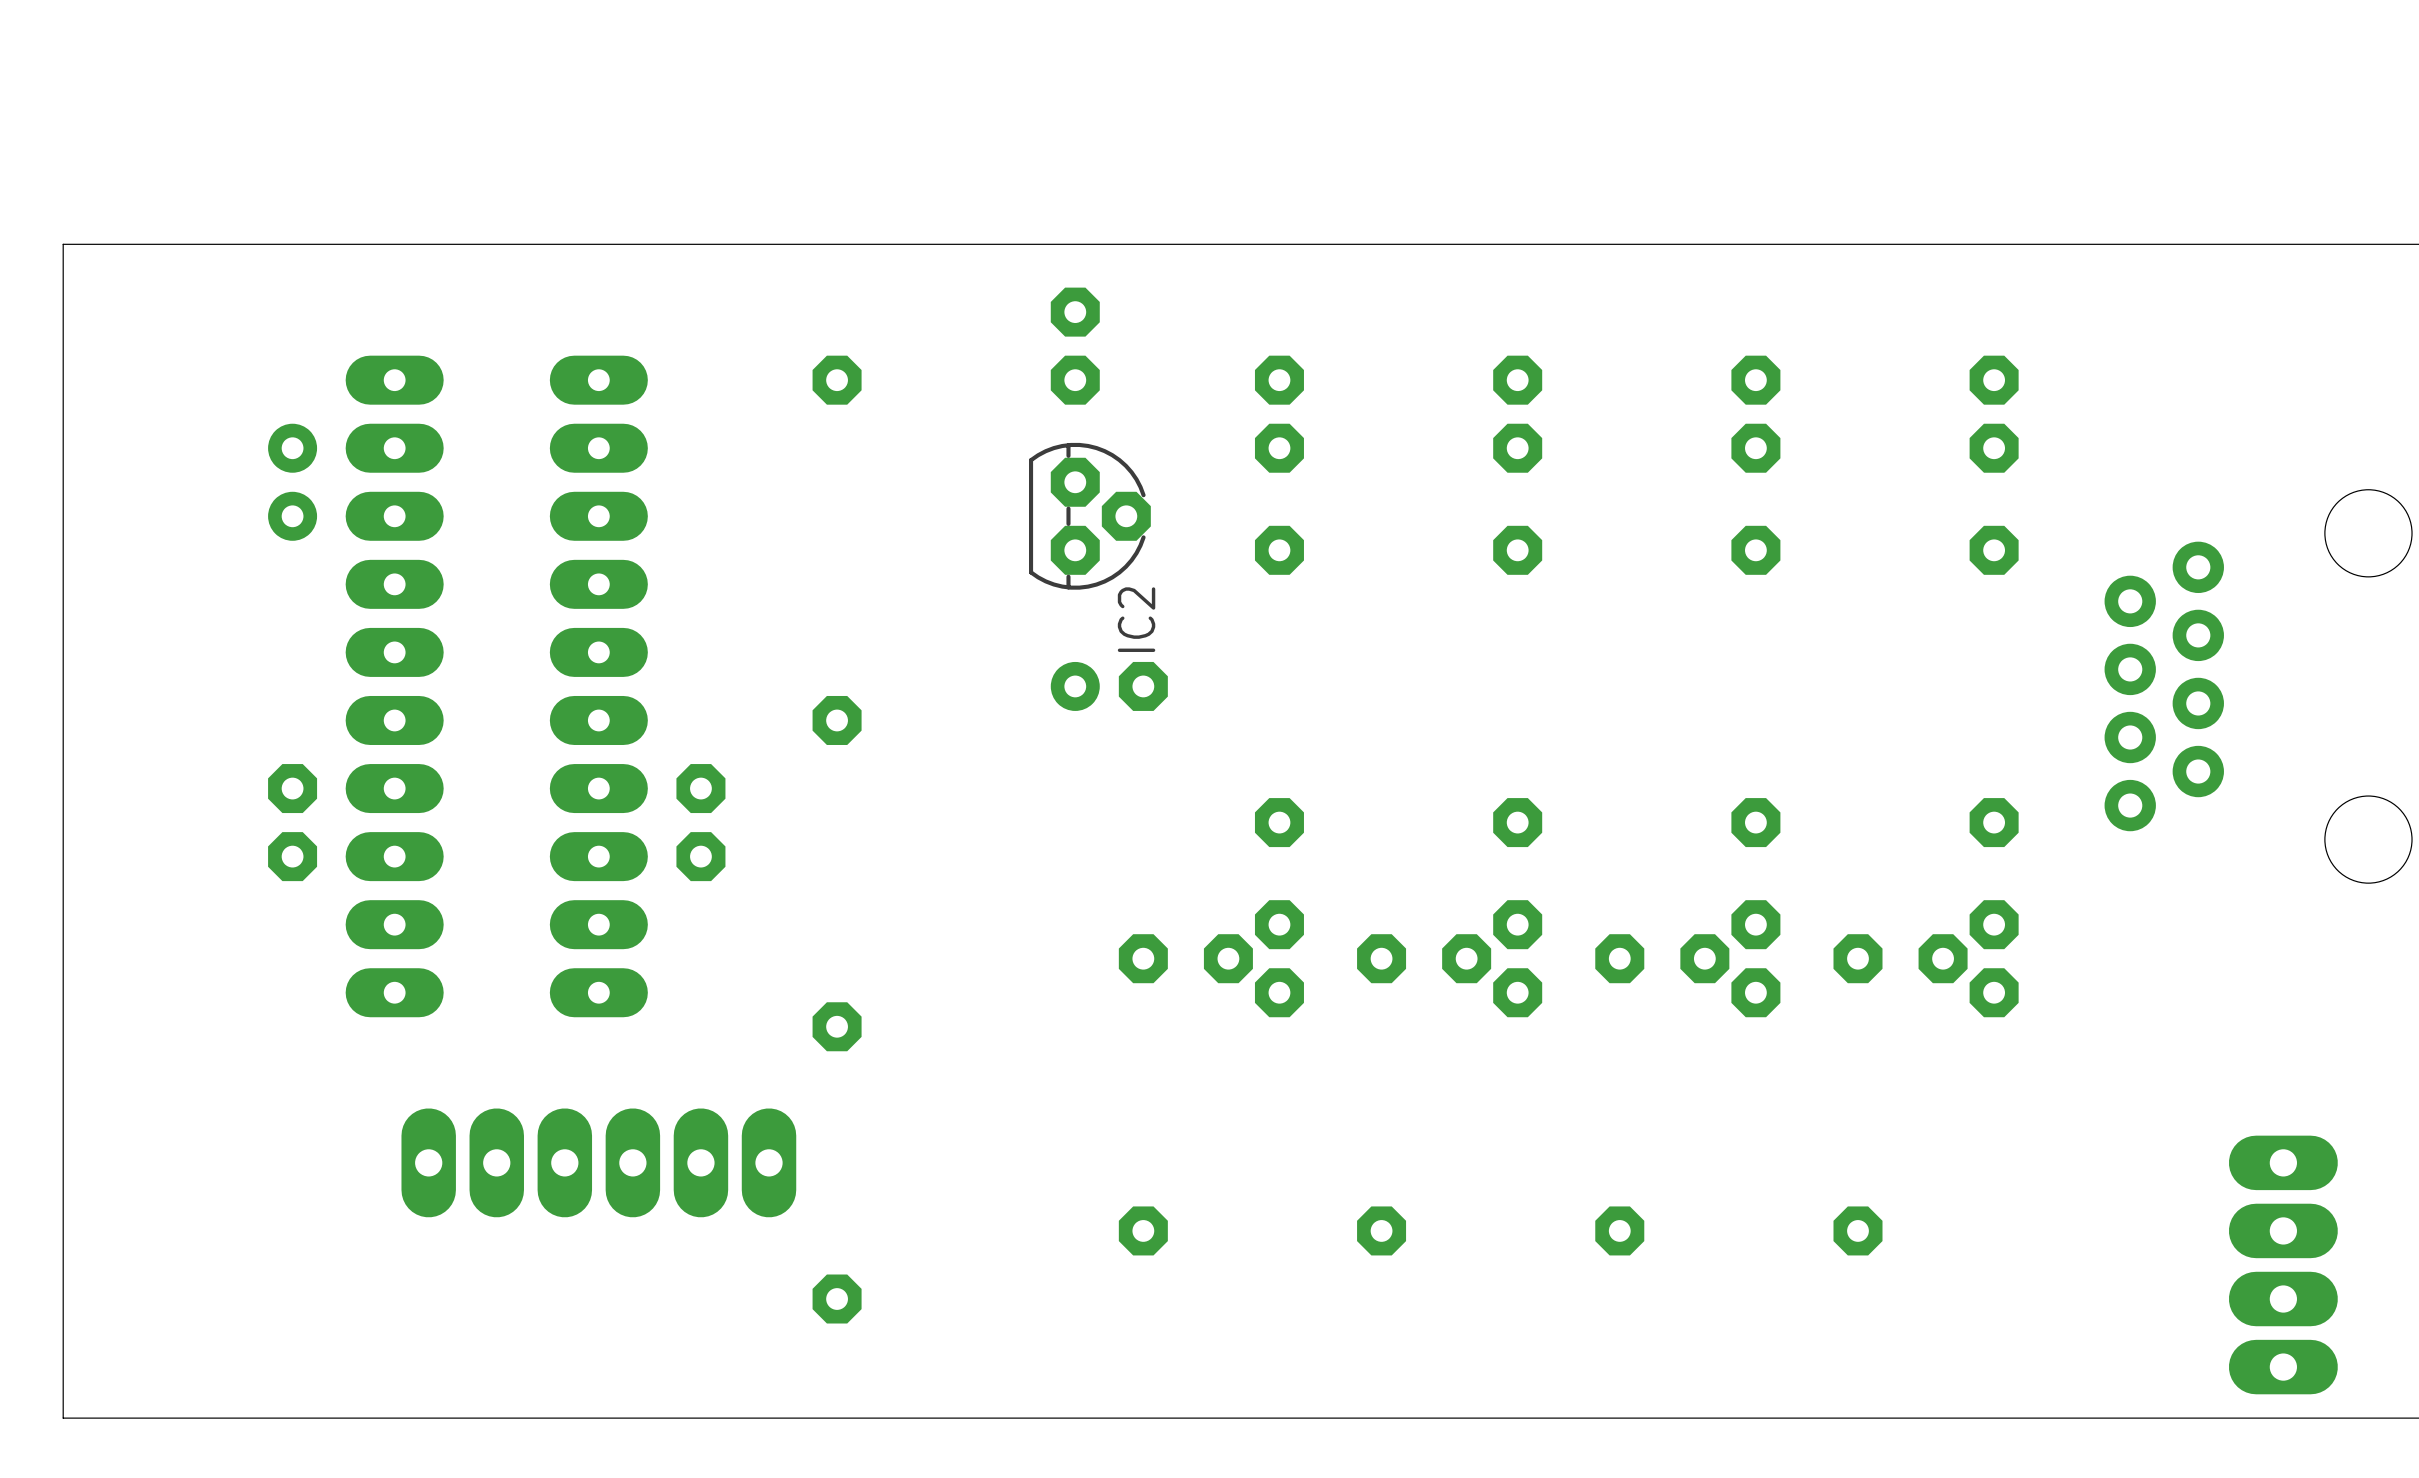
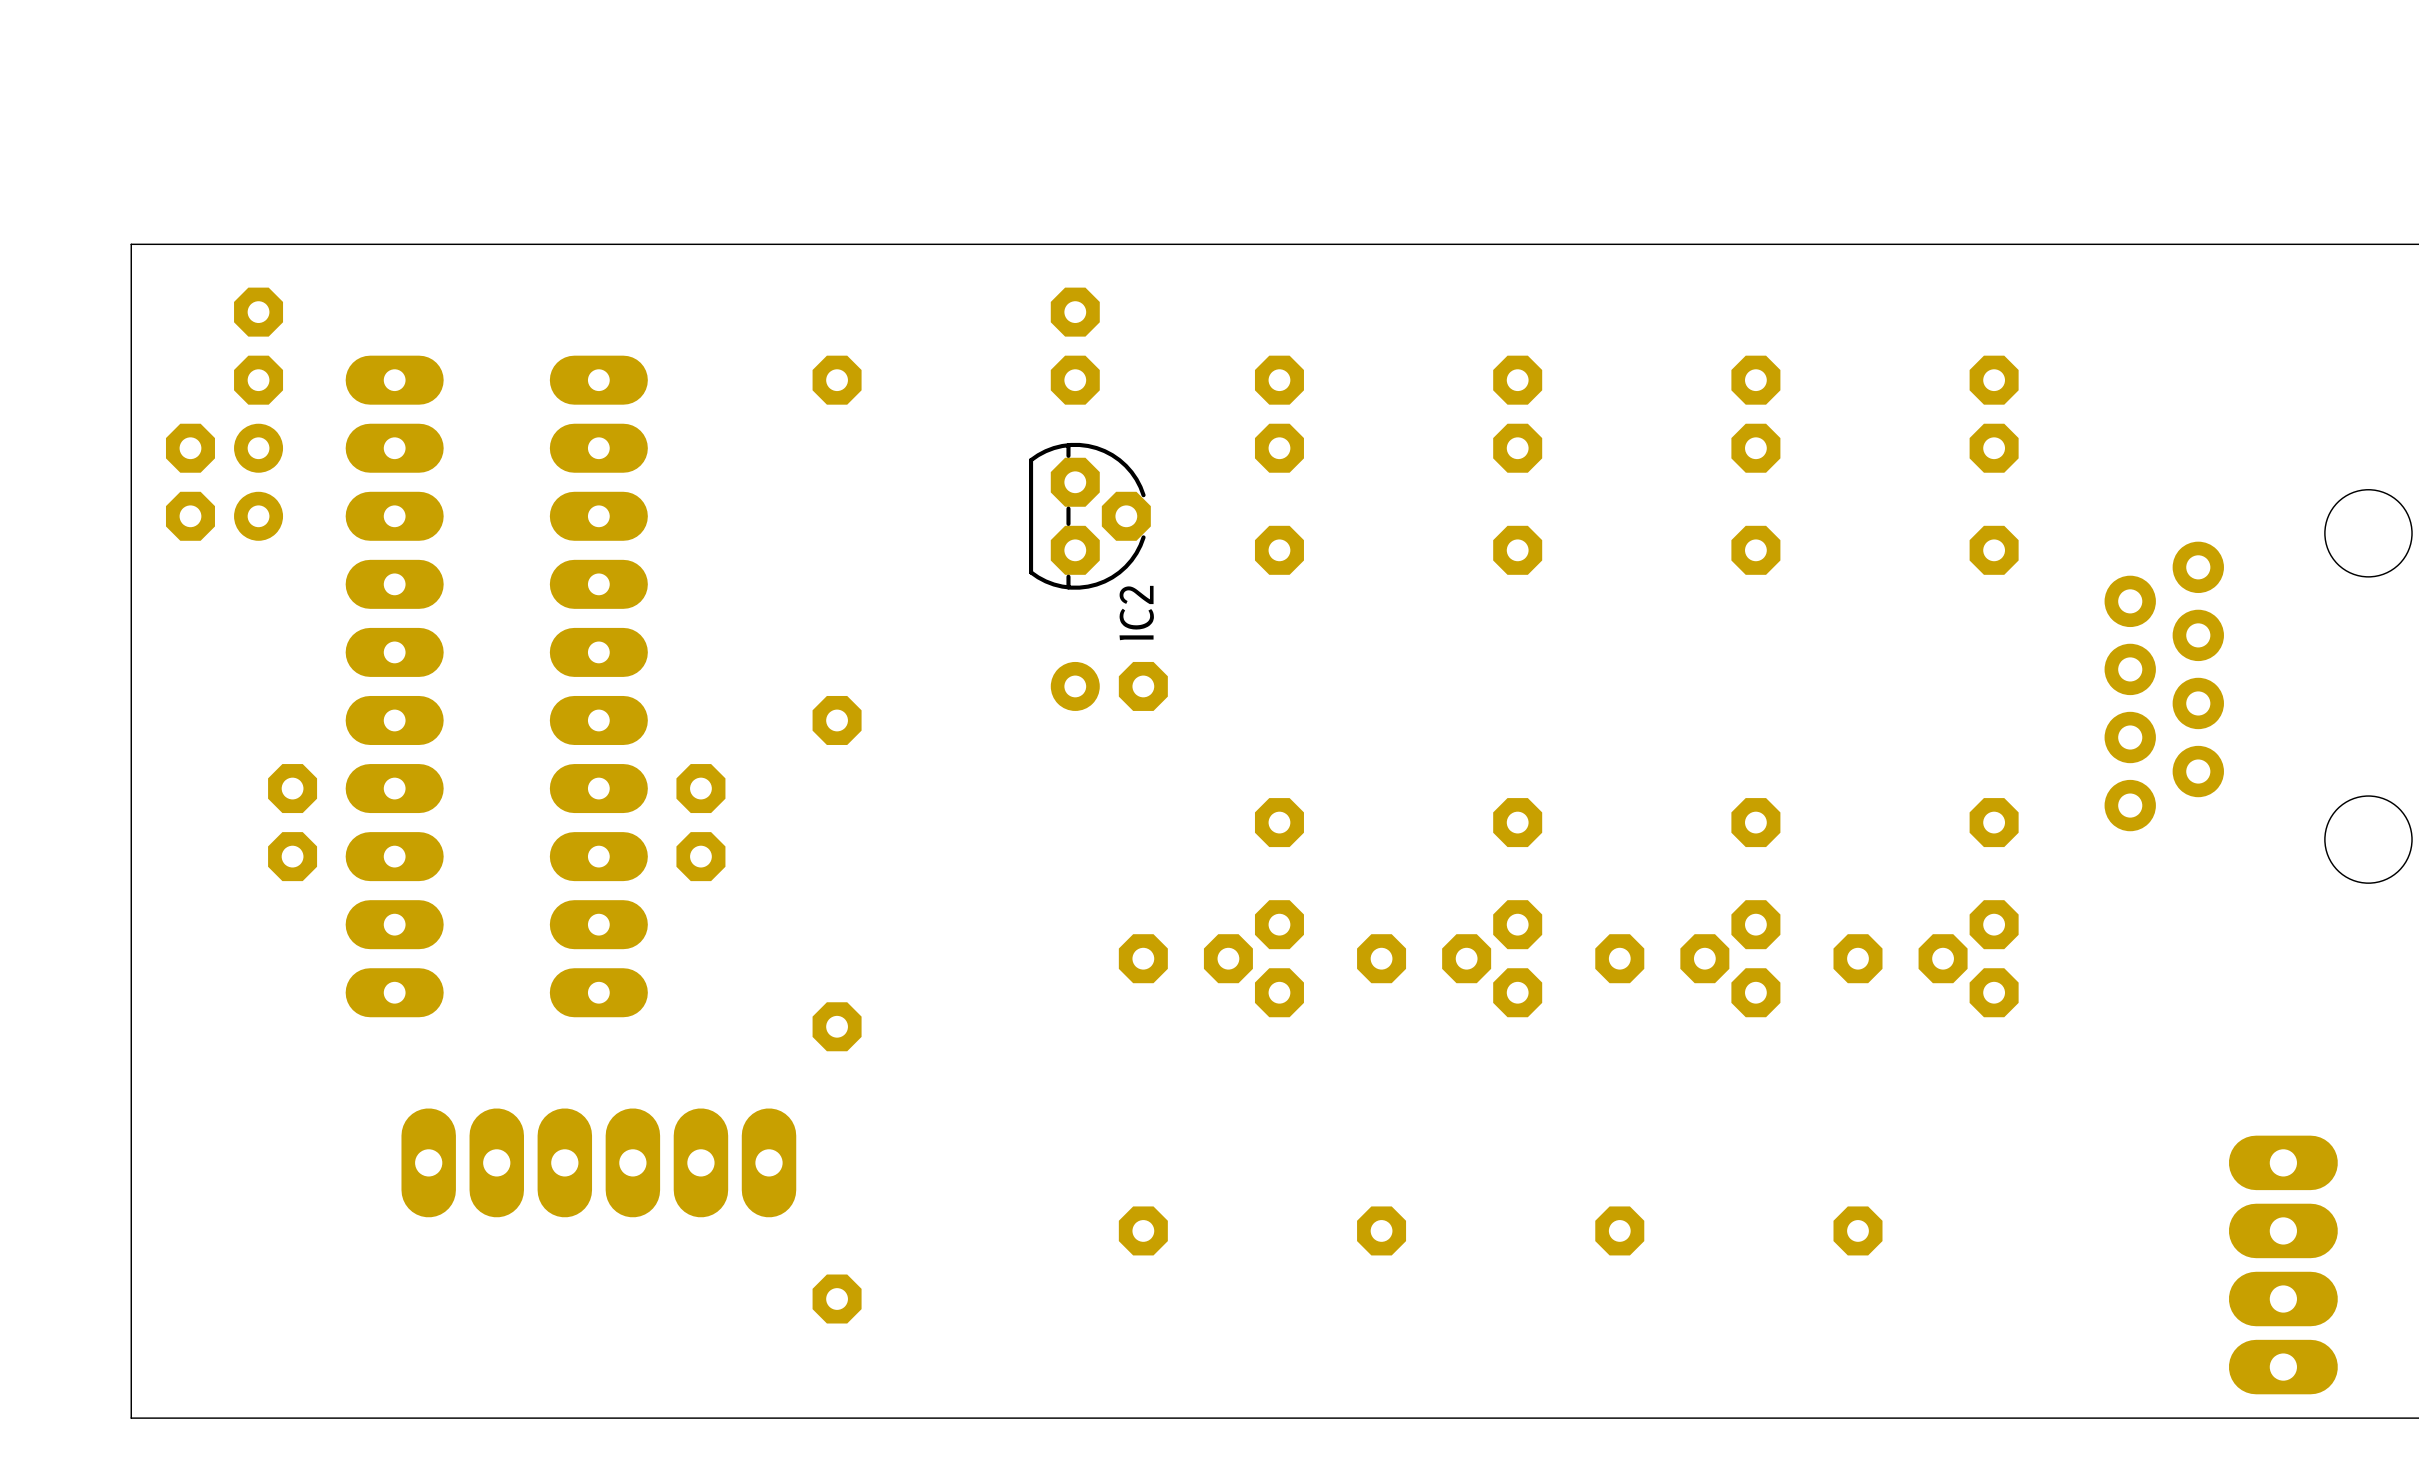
board edge: (131, 244) (63, 244) (63, 1418) (131, 1418) -> (131, 244) (131, 1418)
part: none -> (258, 346)
part: none -> (190, 482)
part position: (292, 482) -> (258, 482)

